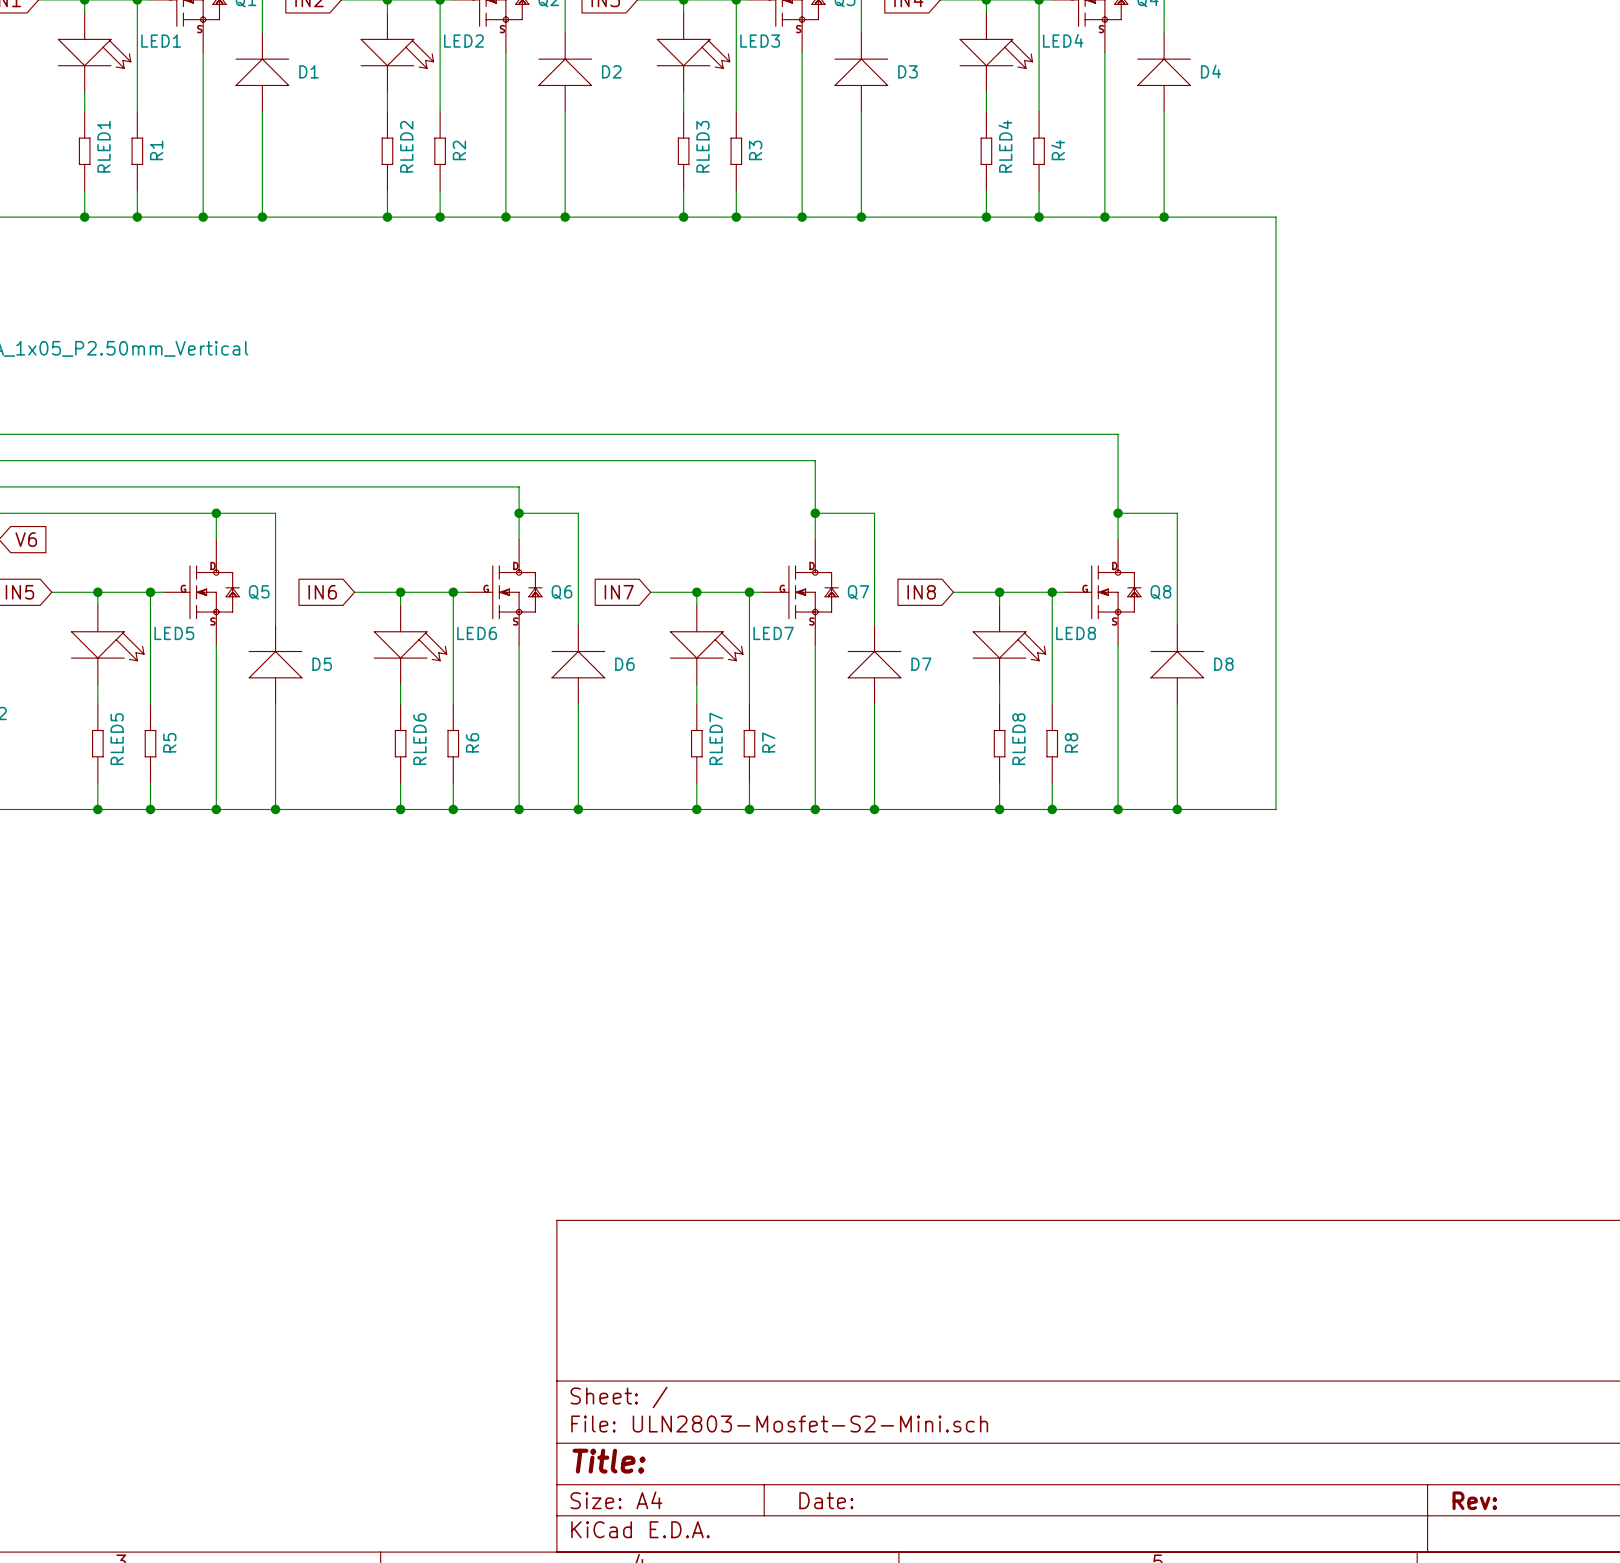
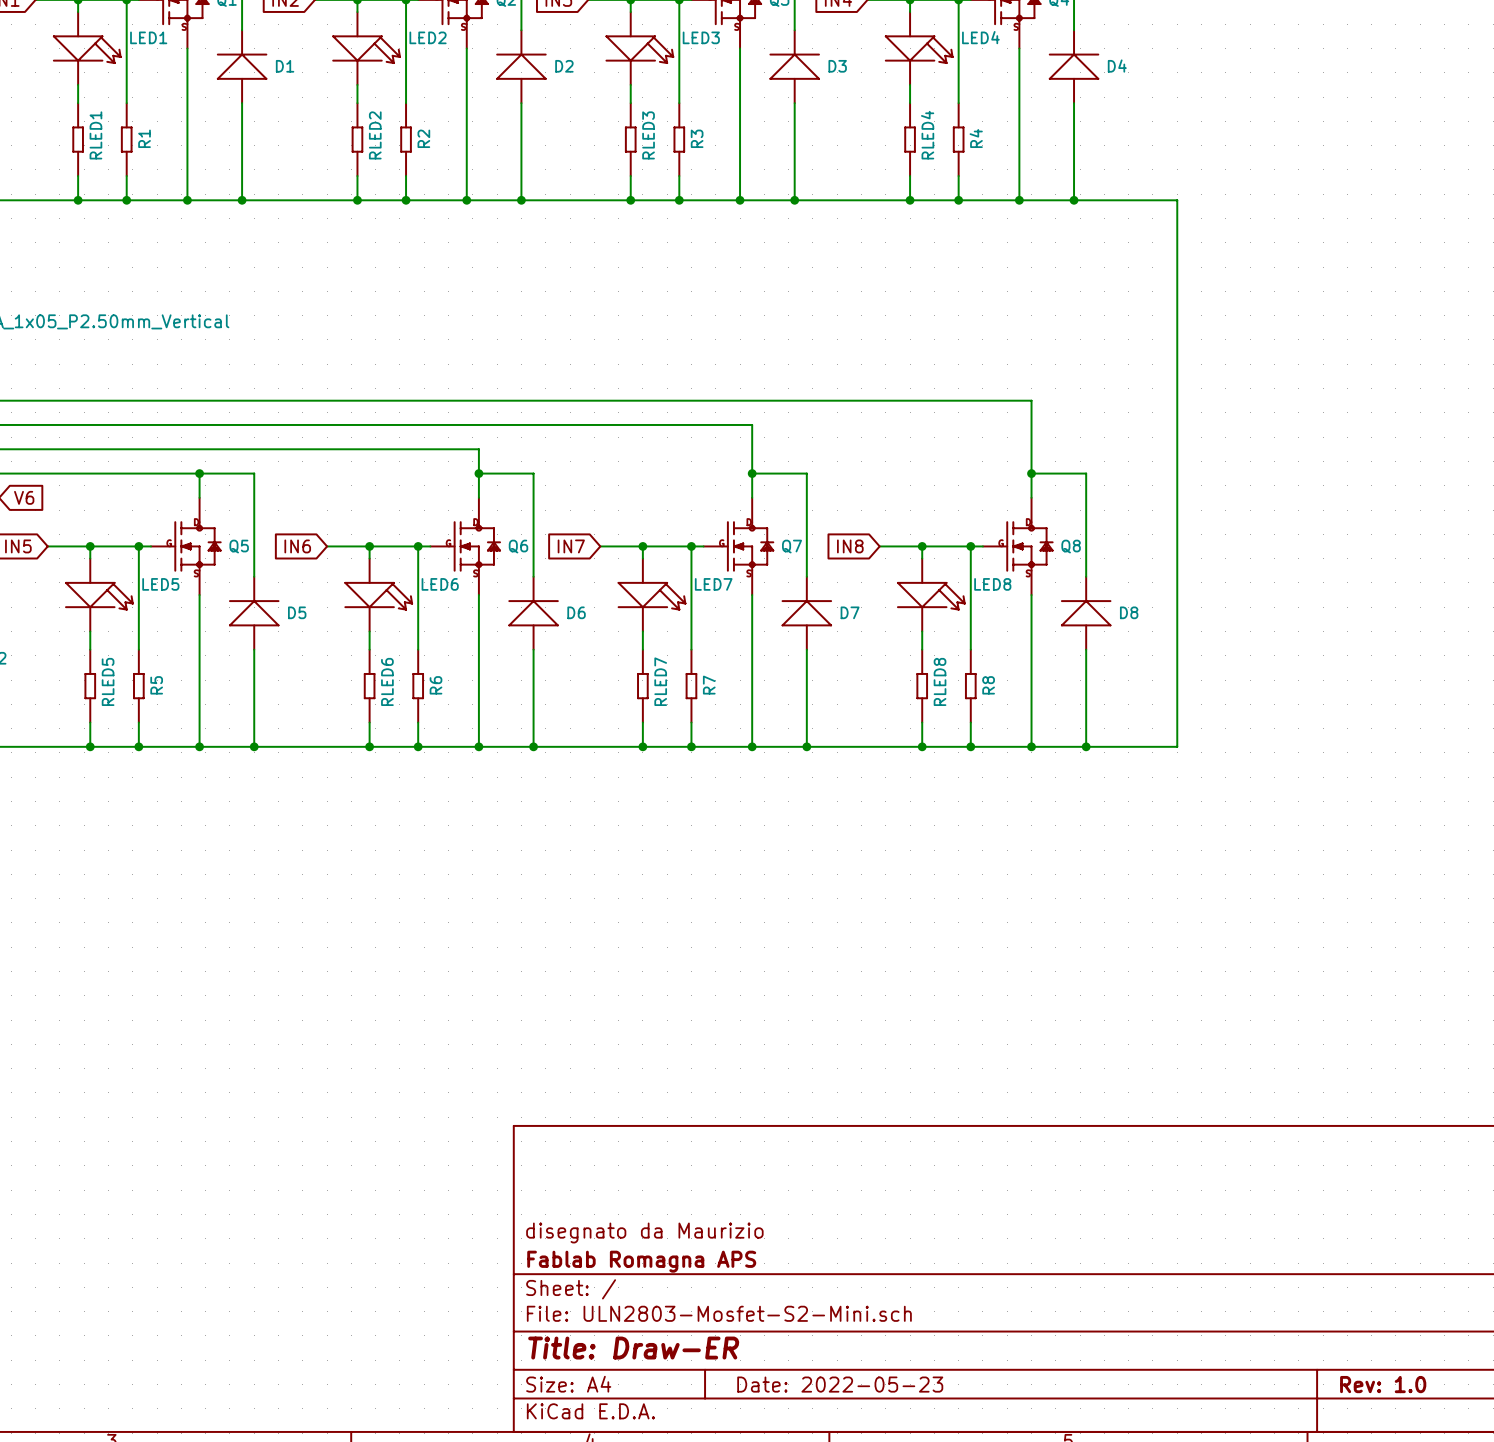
title block: none -> disegnato da Maurizio (644, 1232)
title block: none -> Fablab Romagna APS (641, 1261)
title block: Title: (609, 1461) -> Title: Draw-ER (633, 1348)
title block: Date: (826, 1500) -> Date: 2022-05-23 (840, 1384)
title block: Rev: (1474, 1500) -> Rev: 1.0 (1383, 1384)

